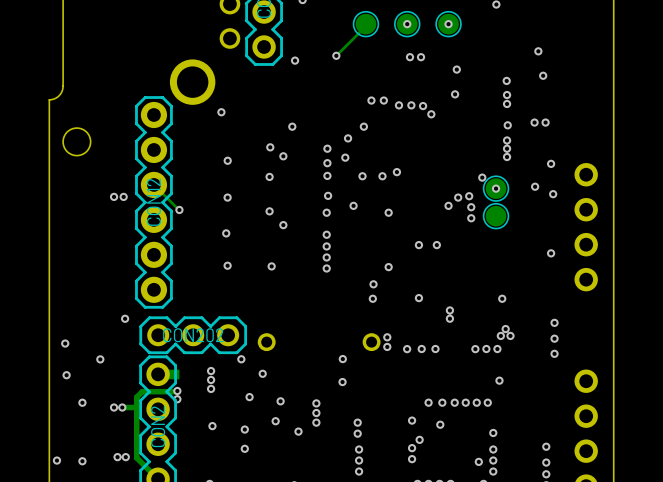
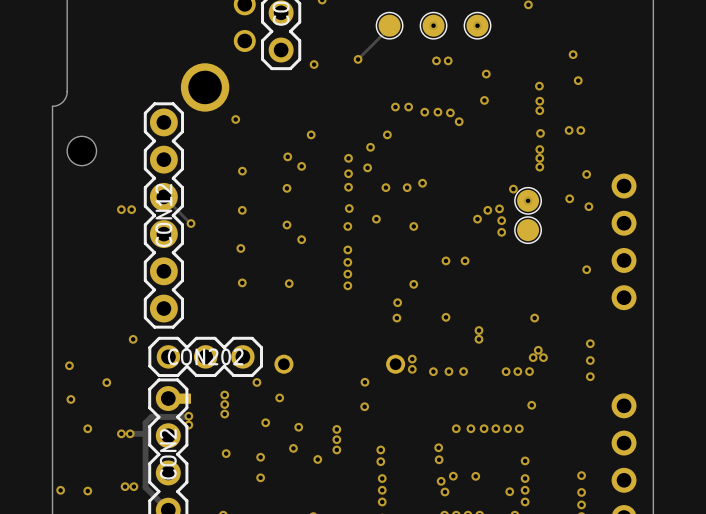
via: (440, 424) -> none
via: none -> (439, 459)
via: (419, 439) -> none
via: none -> (453, 476)
via: none -> (475, 476)
via: (412, 448) -> none
via: none -> (441, 481)
via: (412, 459) -> none
via: none -> (444, 492)

